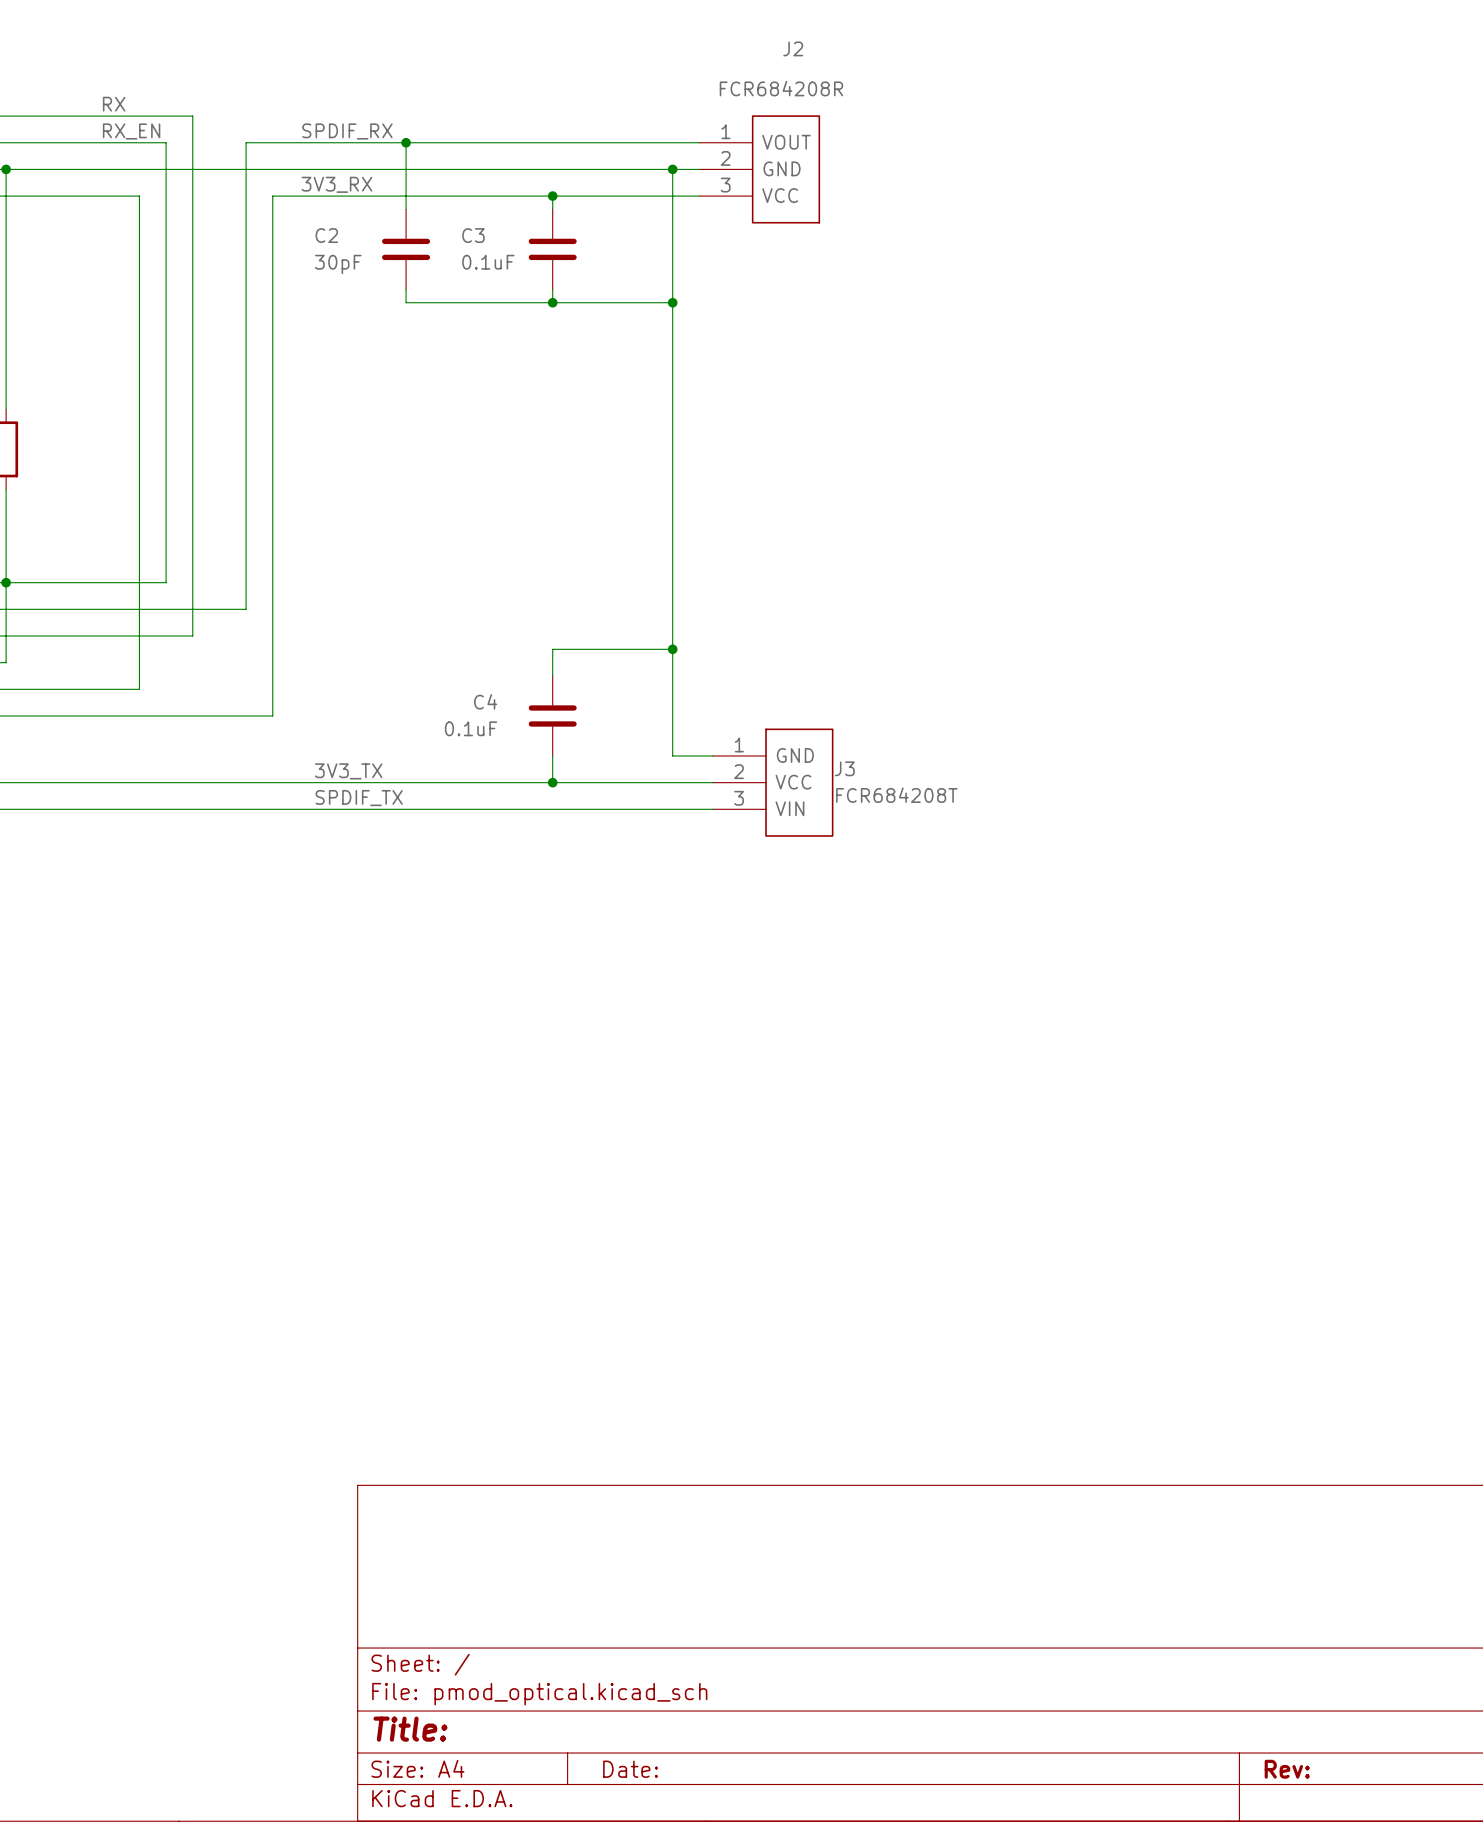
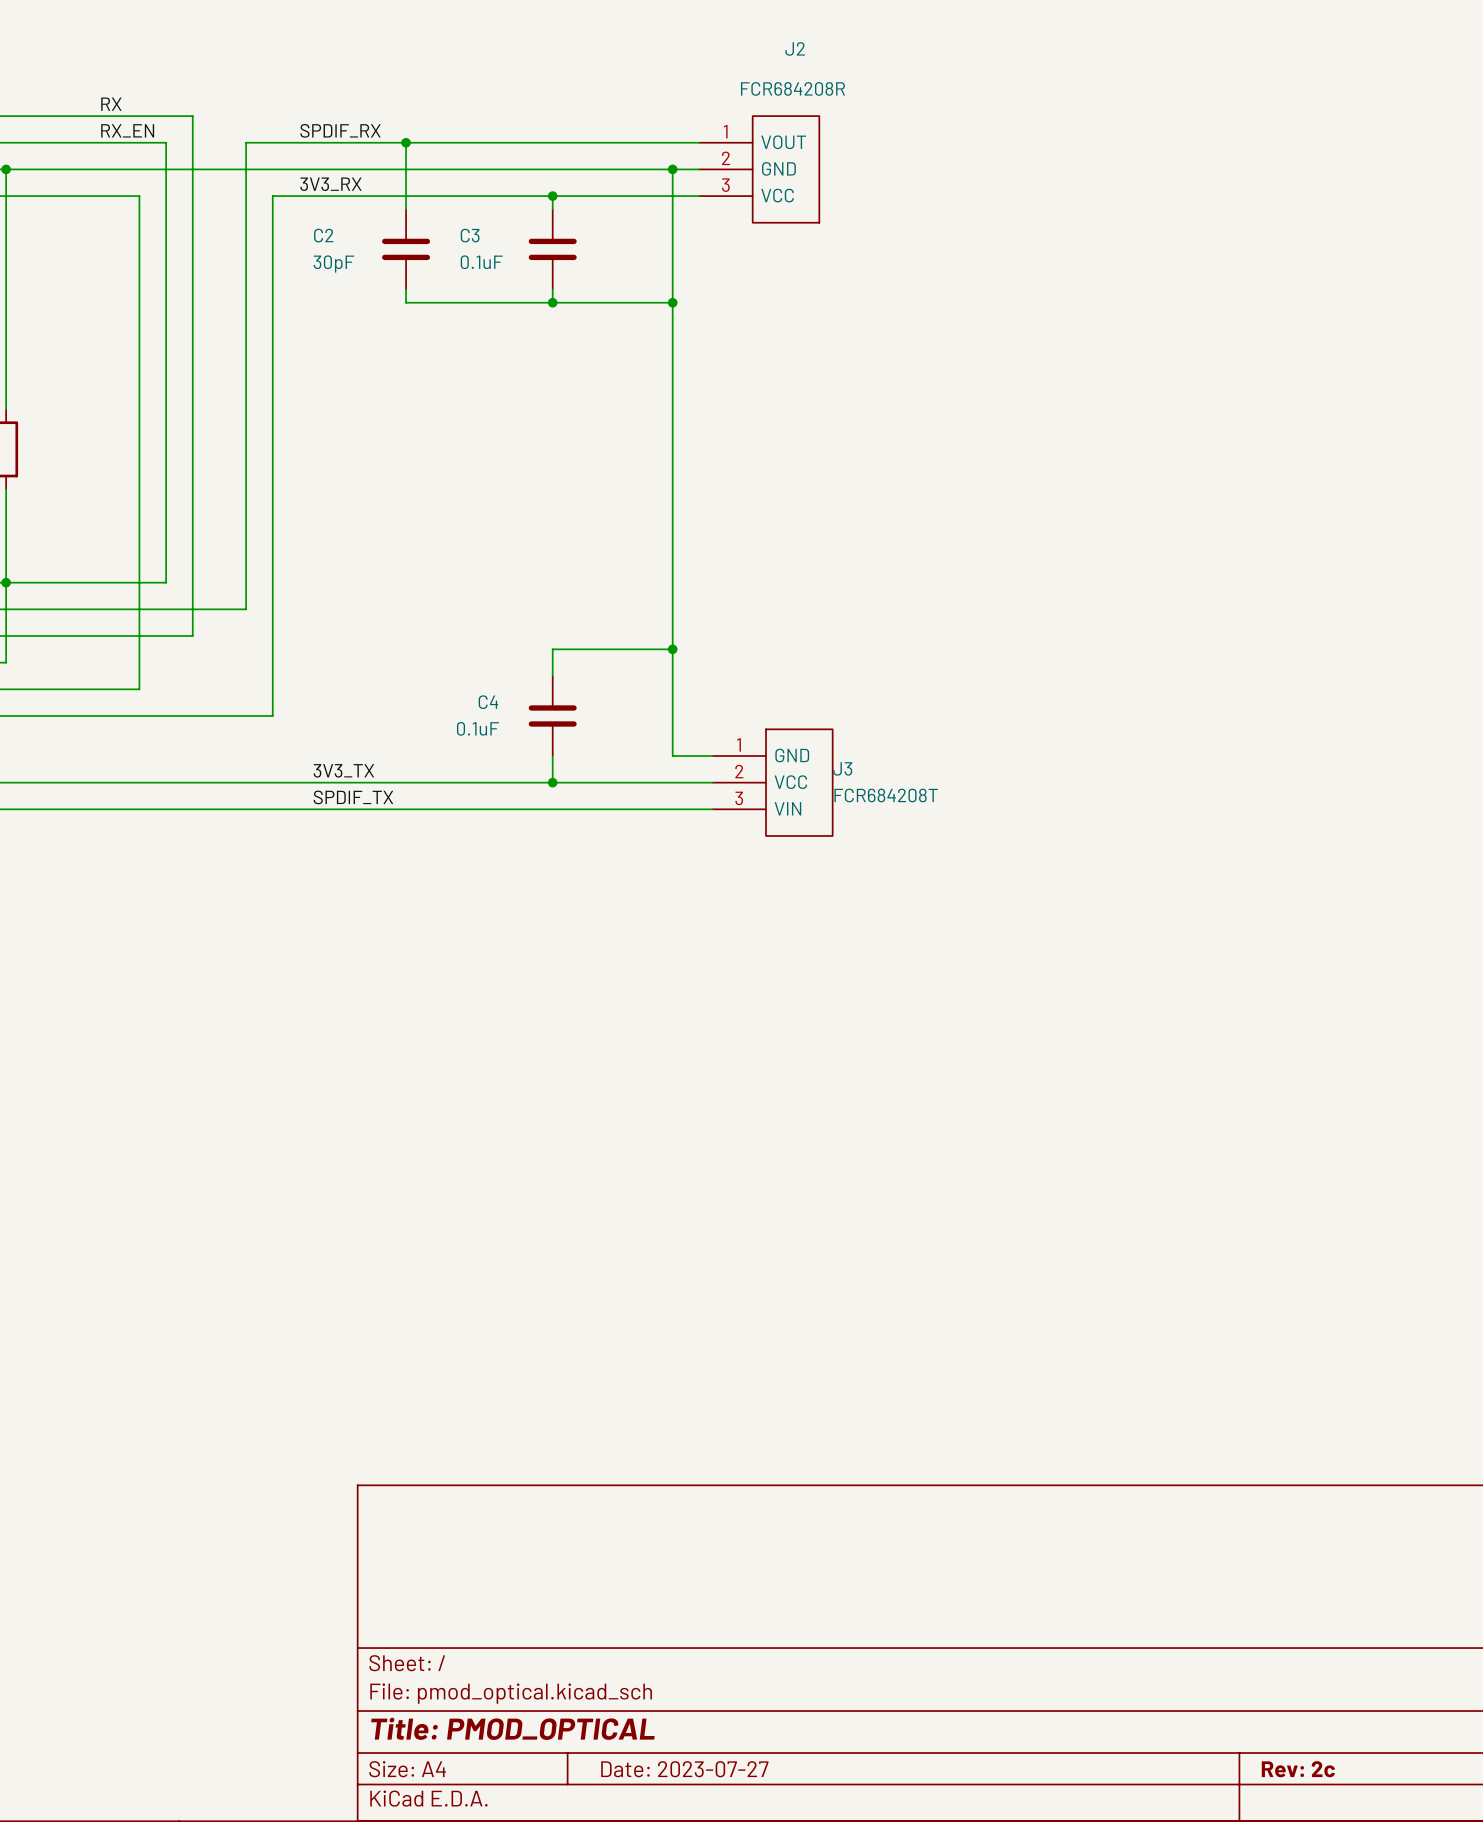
title block: Title: (410, 1729) -> Title: PMOD_OPTICAL (512, 1728)
title block: Date: (630, 1769) -> Date: 2023-07-27 (684, 1769)
title block: Rev: (1287, 1769) -> Rev: 2c (1298, 1769)

